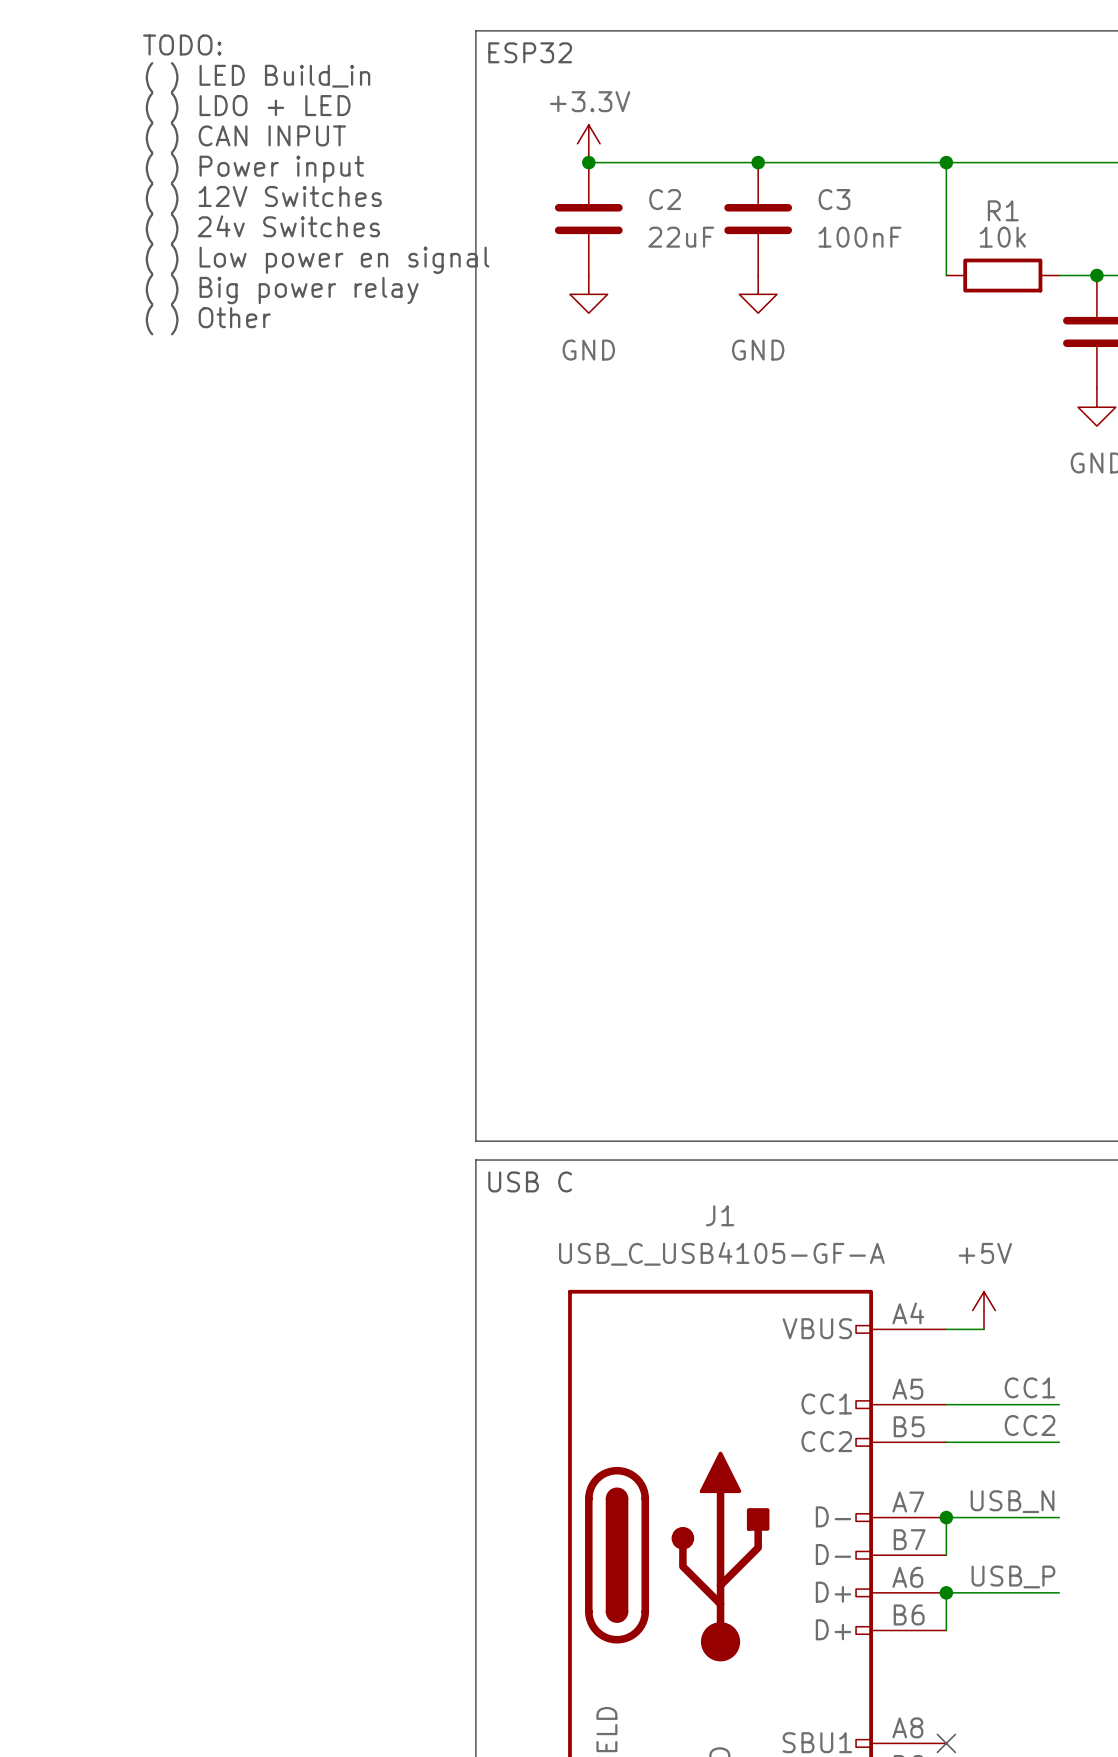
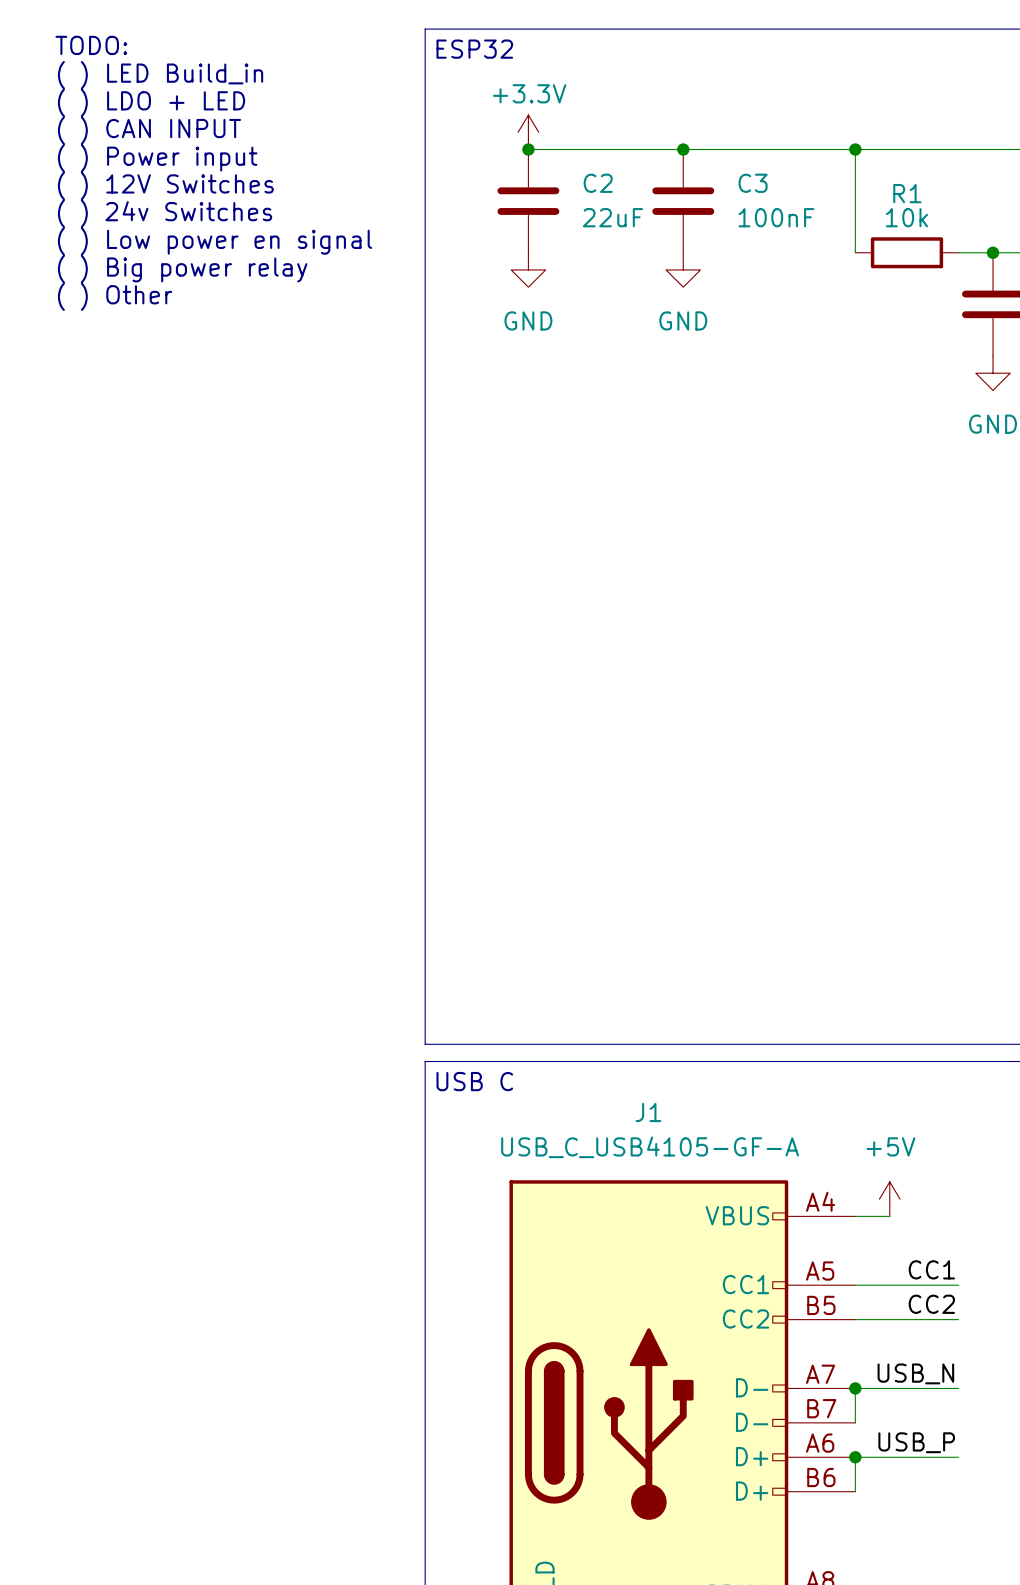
text position: TODO: (182, 44) -> TODO: (91, 45)
text position: ( ) LED Build_in (258, 77) -> ( ) LED Build_in (160, 75)
text position: ( ) LDO + LED (248, 107) -> ( ) LDO + LED (151, 102)
text position: ( ) CAN INPUT (245, 138) -> ( ) CAN INPUT (149, 130)
text position: ( ) Power input (254, 168) -> ( ) Power input (157, 158)
text position: ( ) 12V Switches (263, 198) -> ( ) 12V Switches (165, 185)
text position: ( ) 24v Switches (262, 229) -> ( ) 24v Switches (165, 213)
text position: ( ) Low power en signal (317, 259) -> ( ) Low power en signal (215, 241)
text position: ( ) Big power relay (282, 289) -> ( ) Big power relay (182, 269)
text position: ( ) Other (208, 319) -> ( ) Other (115, 296)

